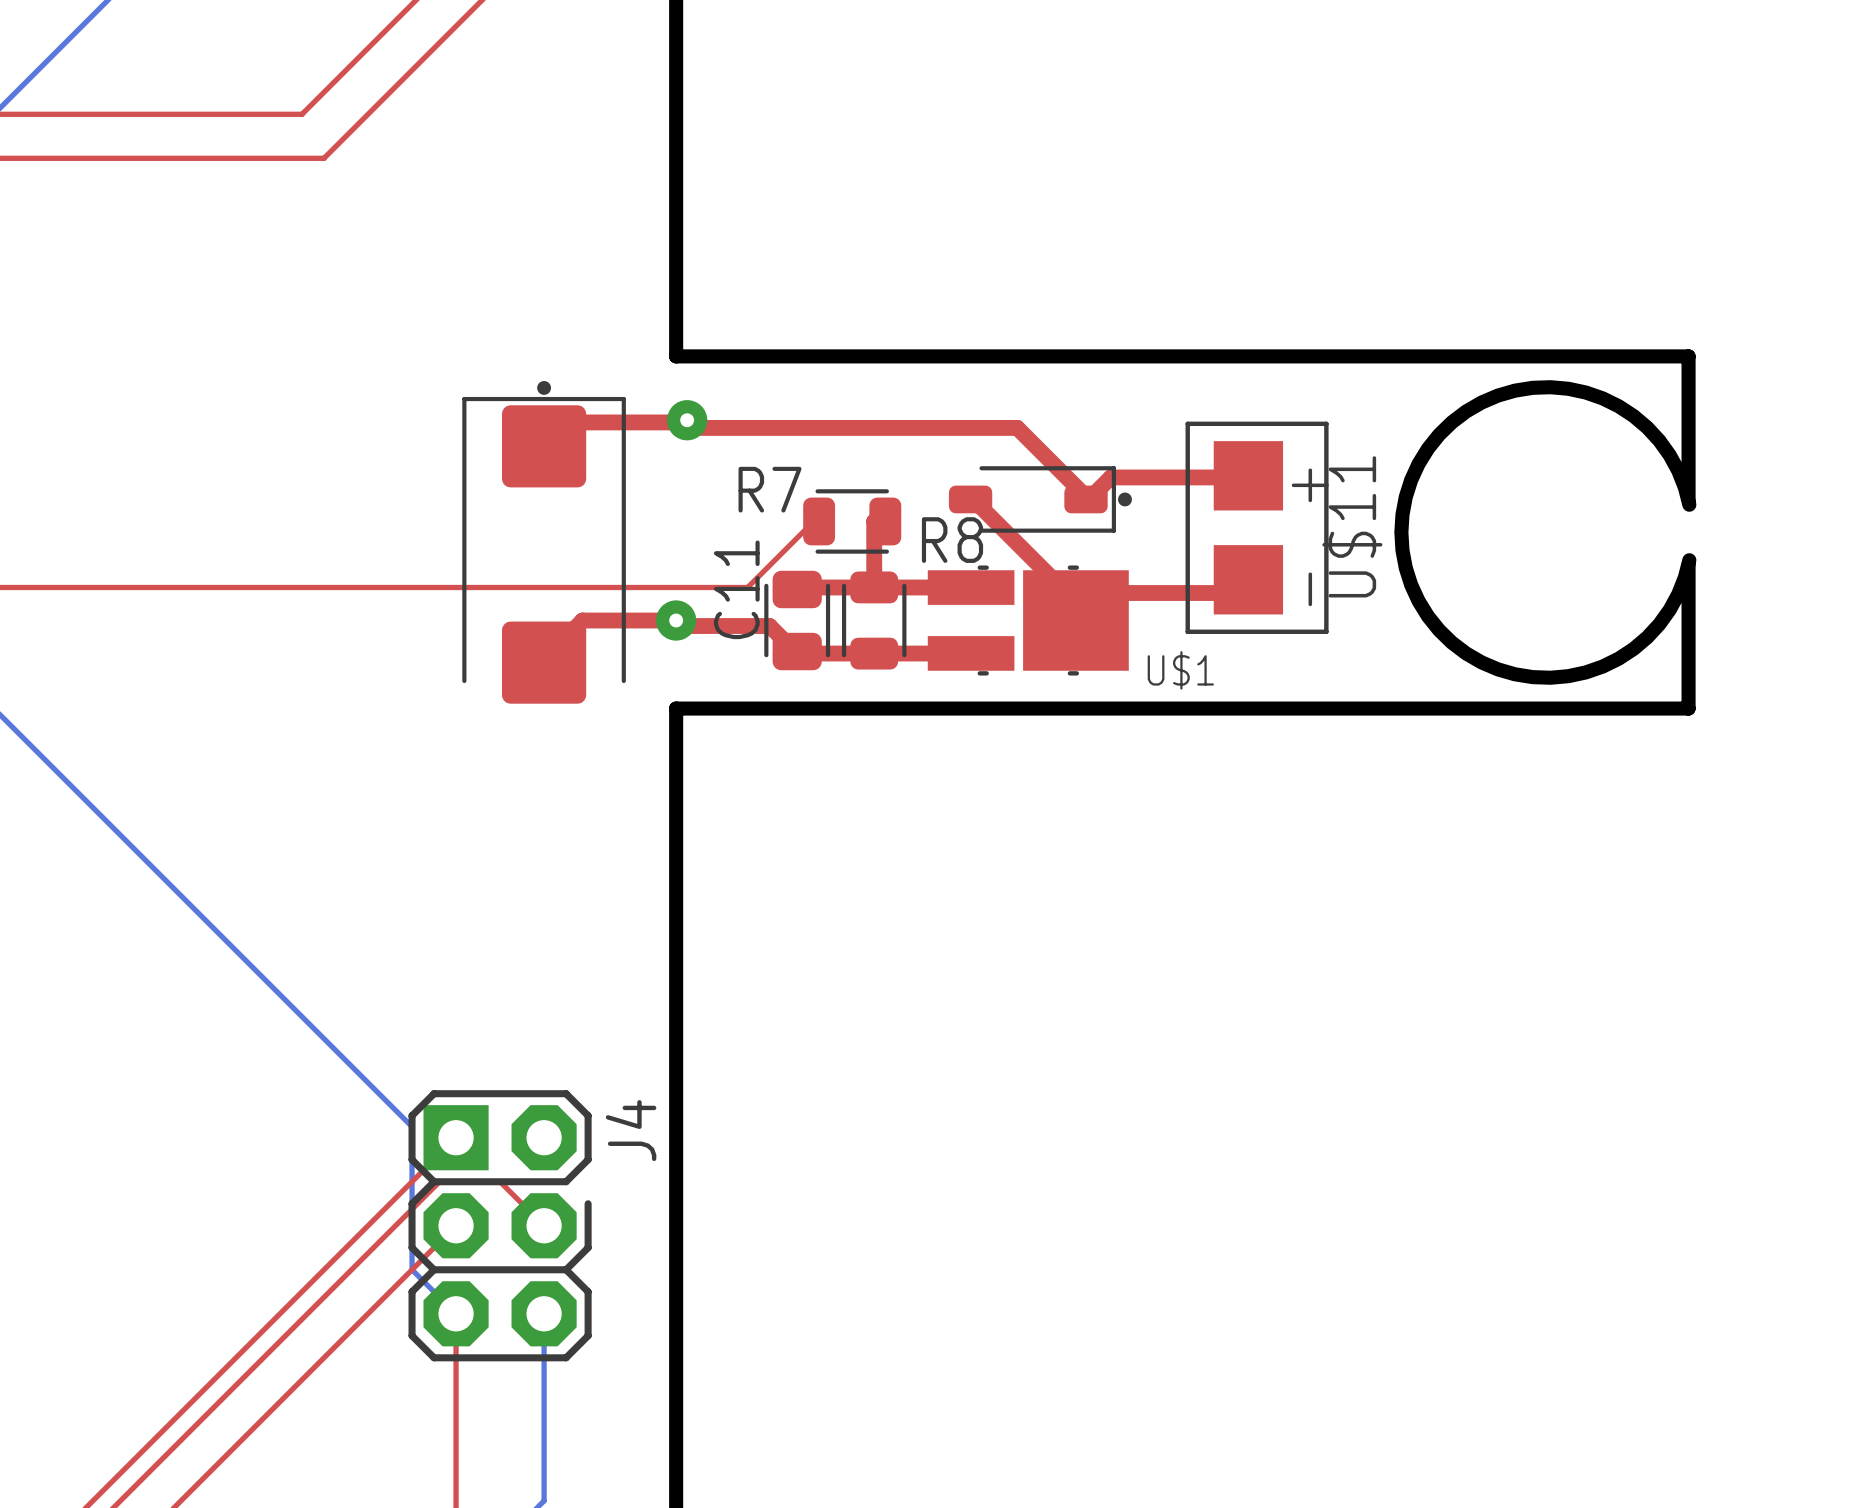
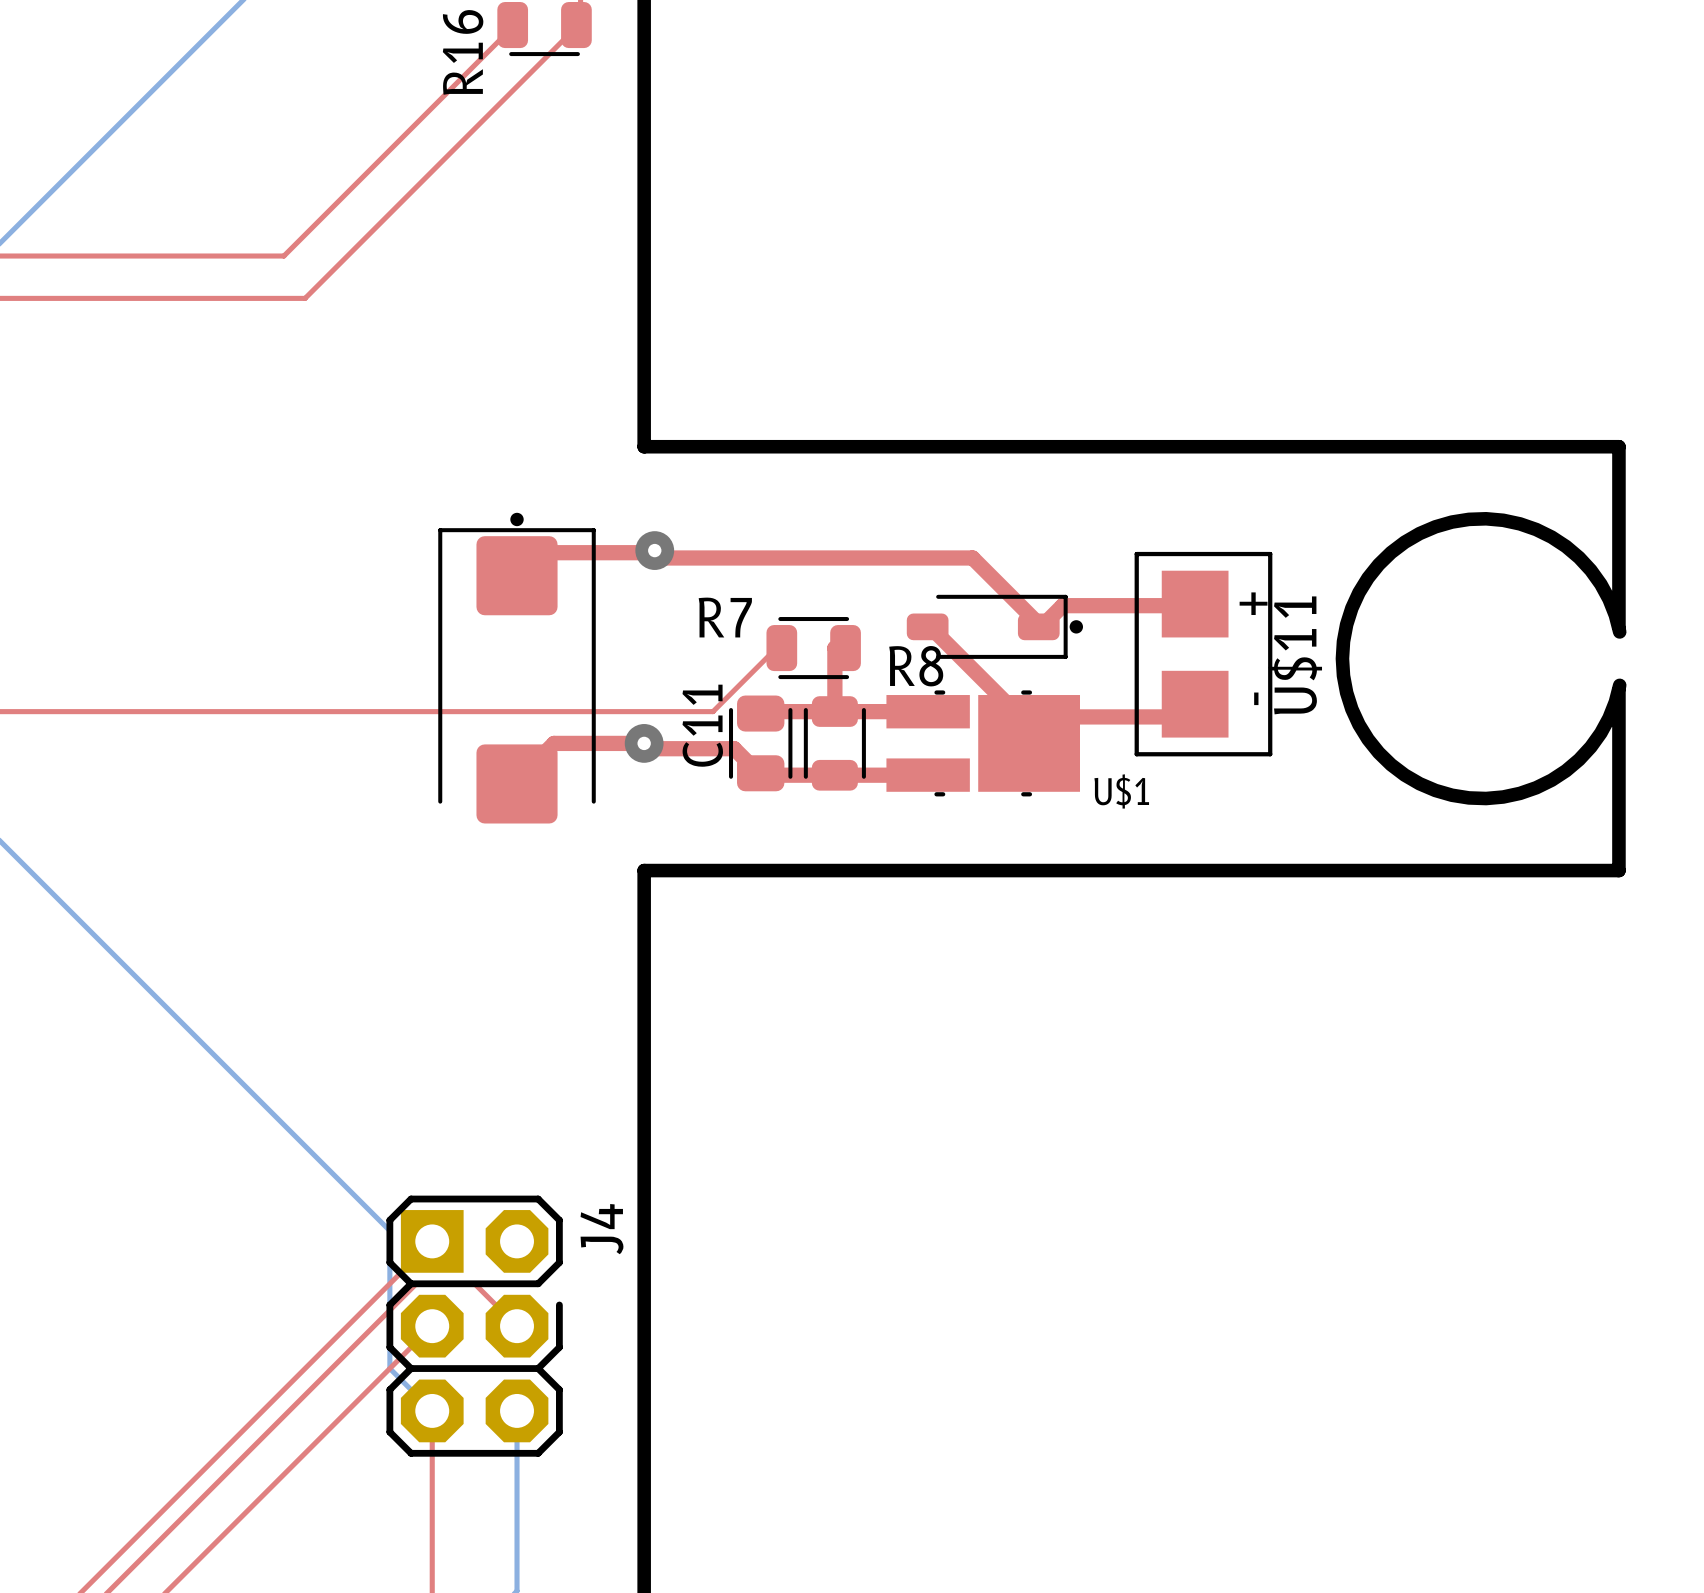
board edge: (676, 312) (676, 356) (1688, 356) -> (644, 446) (1618, 446) (1618, 489)
board edge: (1688, 708) (676, 708) (676, 752) -> (1618, 828) (1618, 870) (644, 870)

